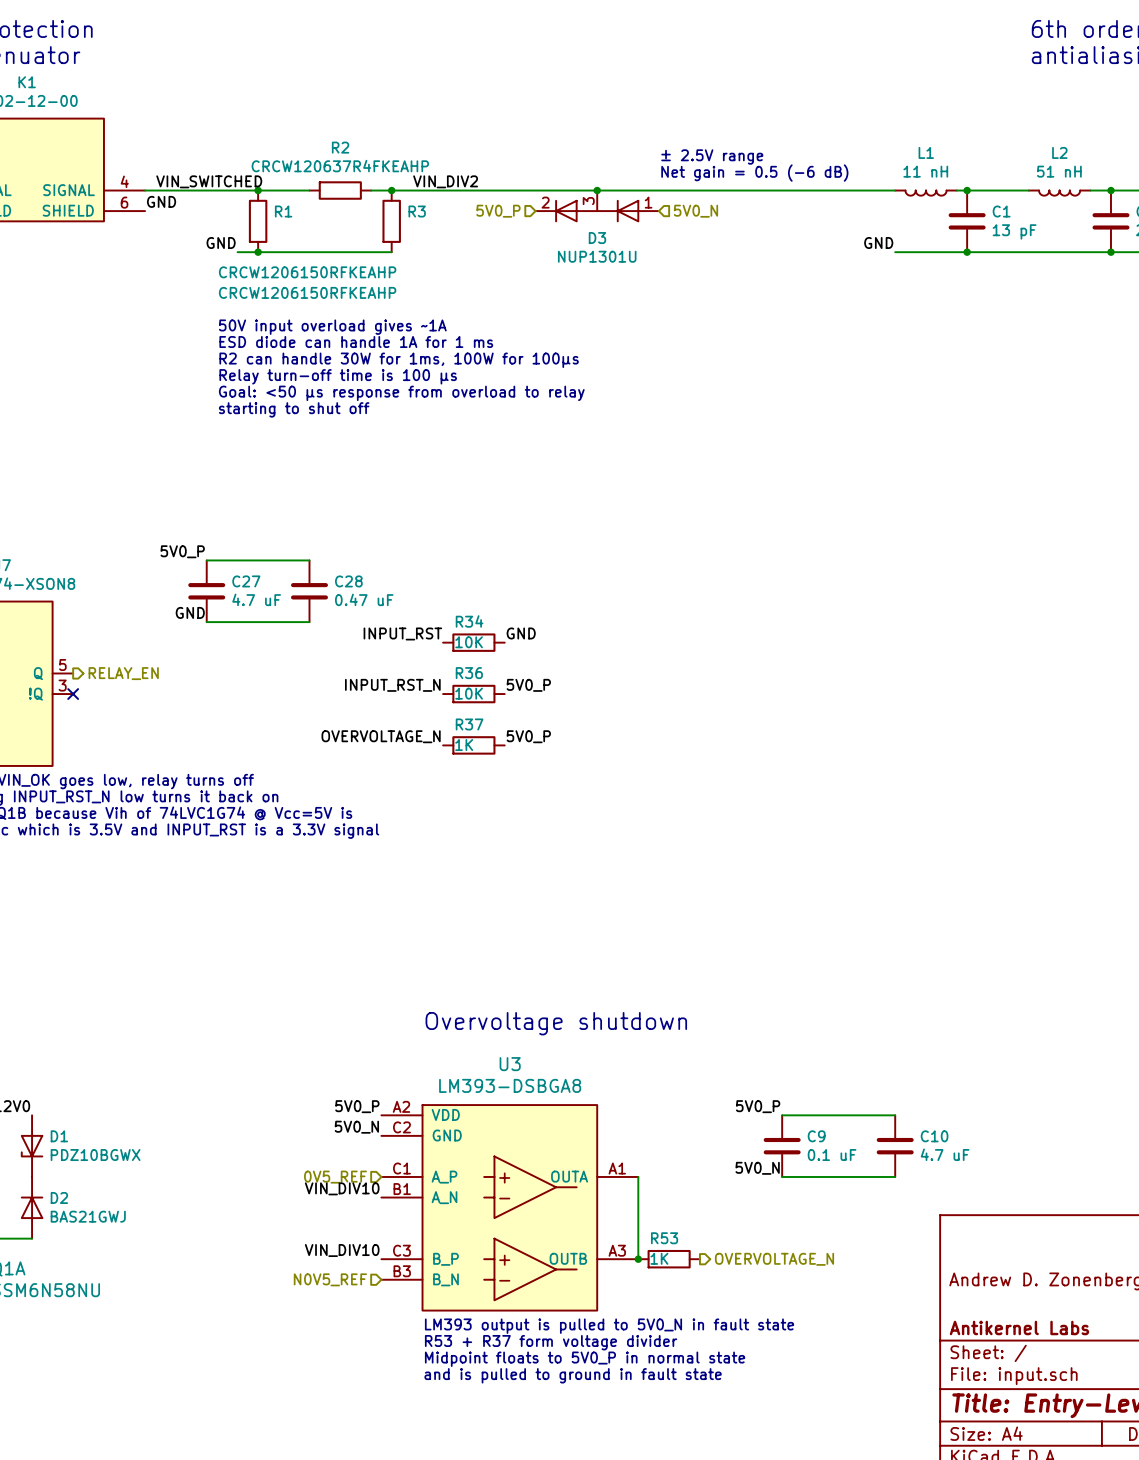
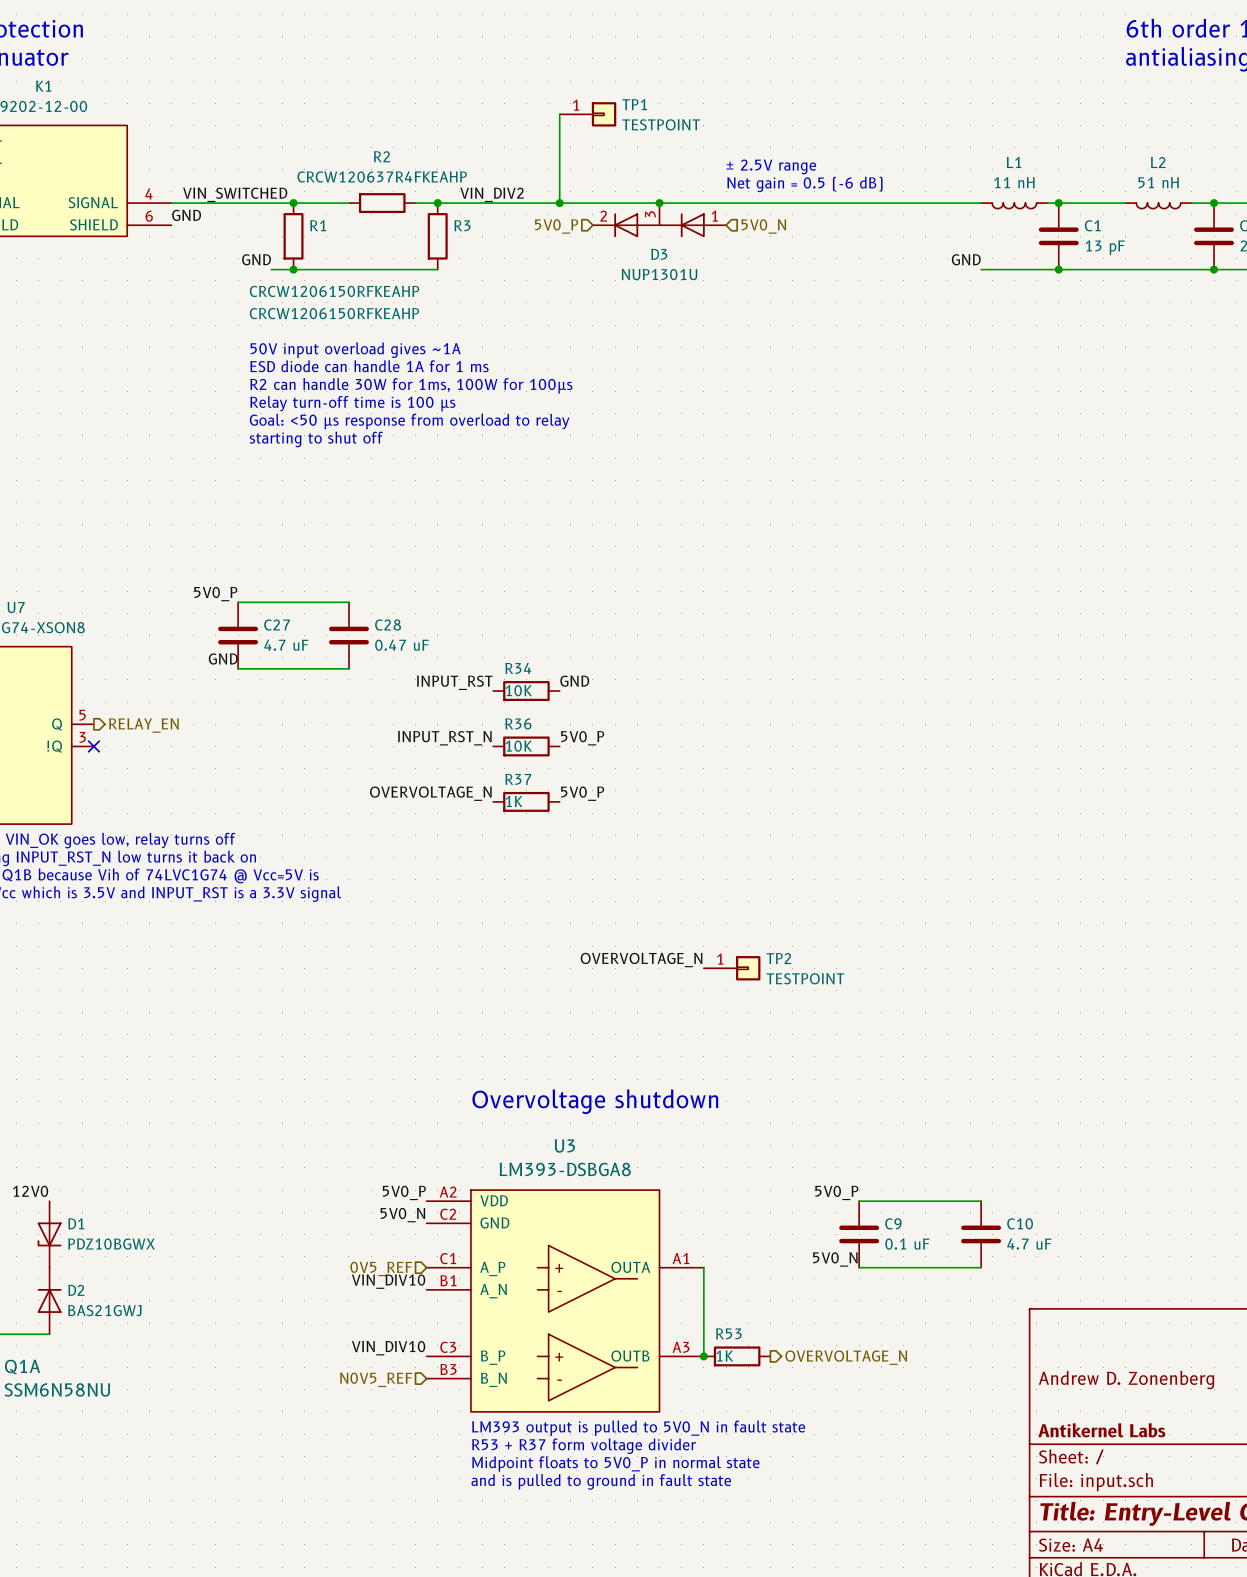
wire: none -> (559, 114) (559, 203)
TP1: none -> TESTPOINT (587, 114)
junction: none -> (559, 203)
label: none -> OVERVOLTAGE_N (641, 960)
TP2: none -> TESTPOINT (732, 968)

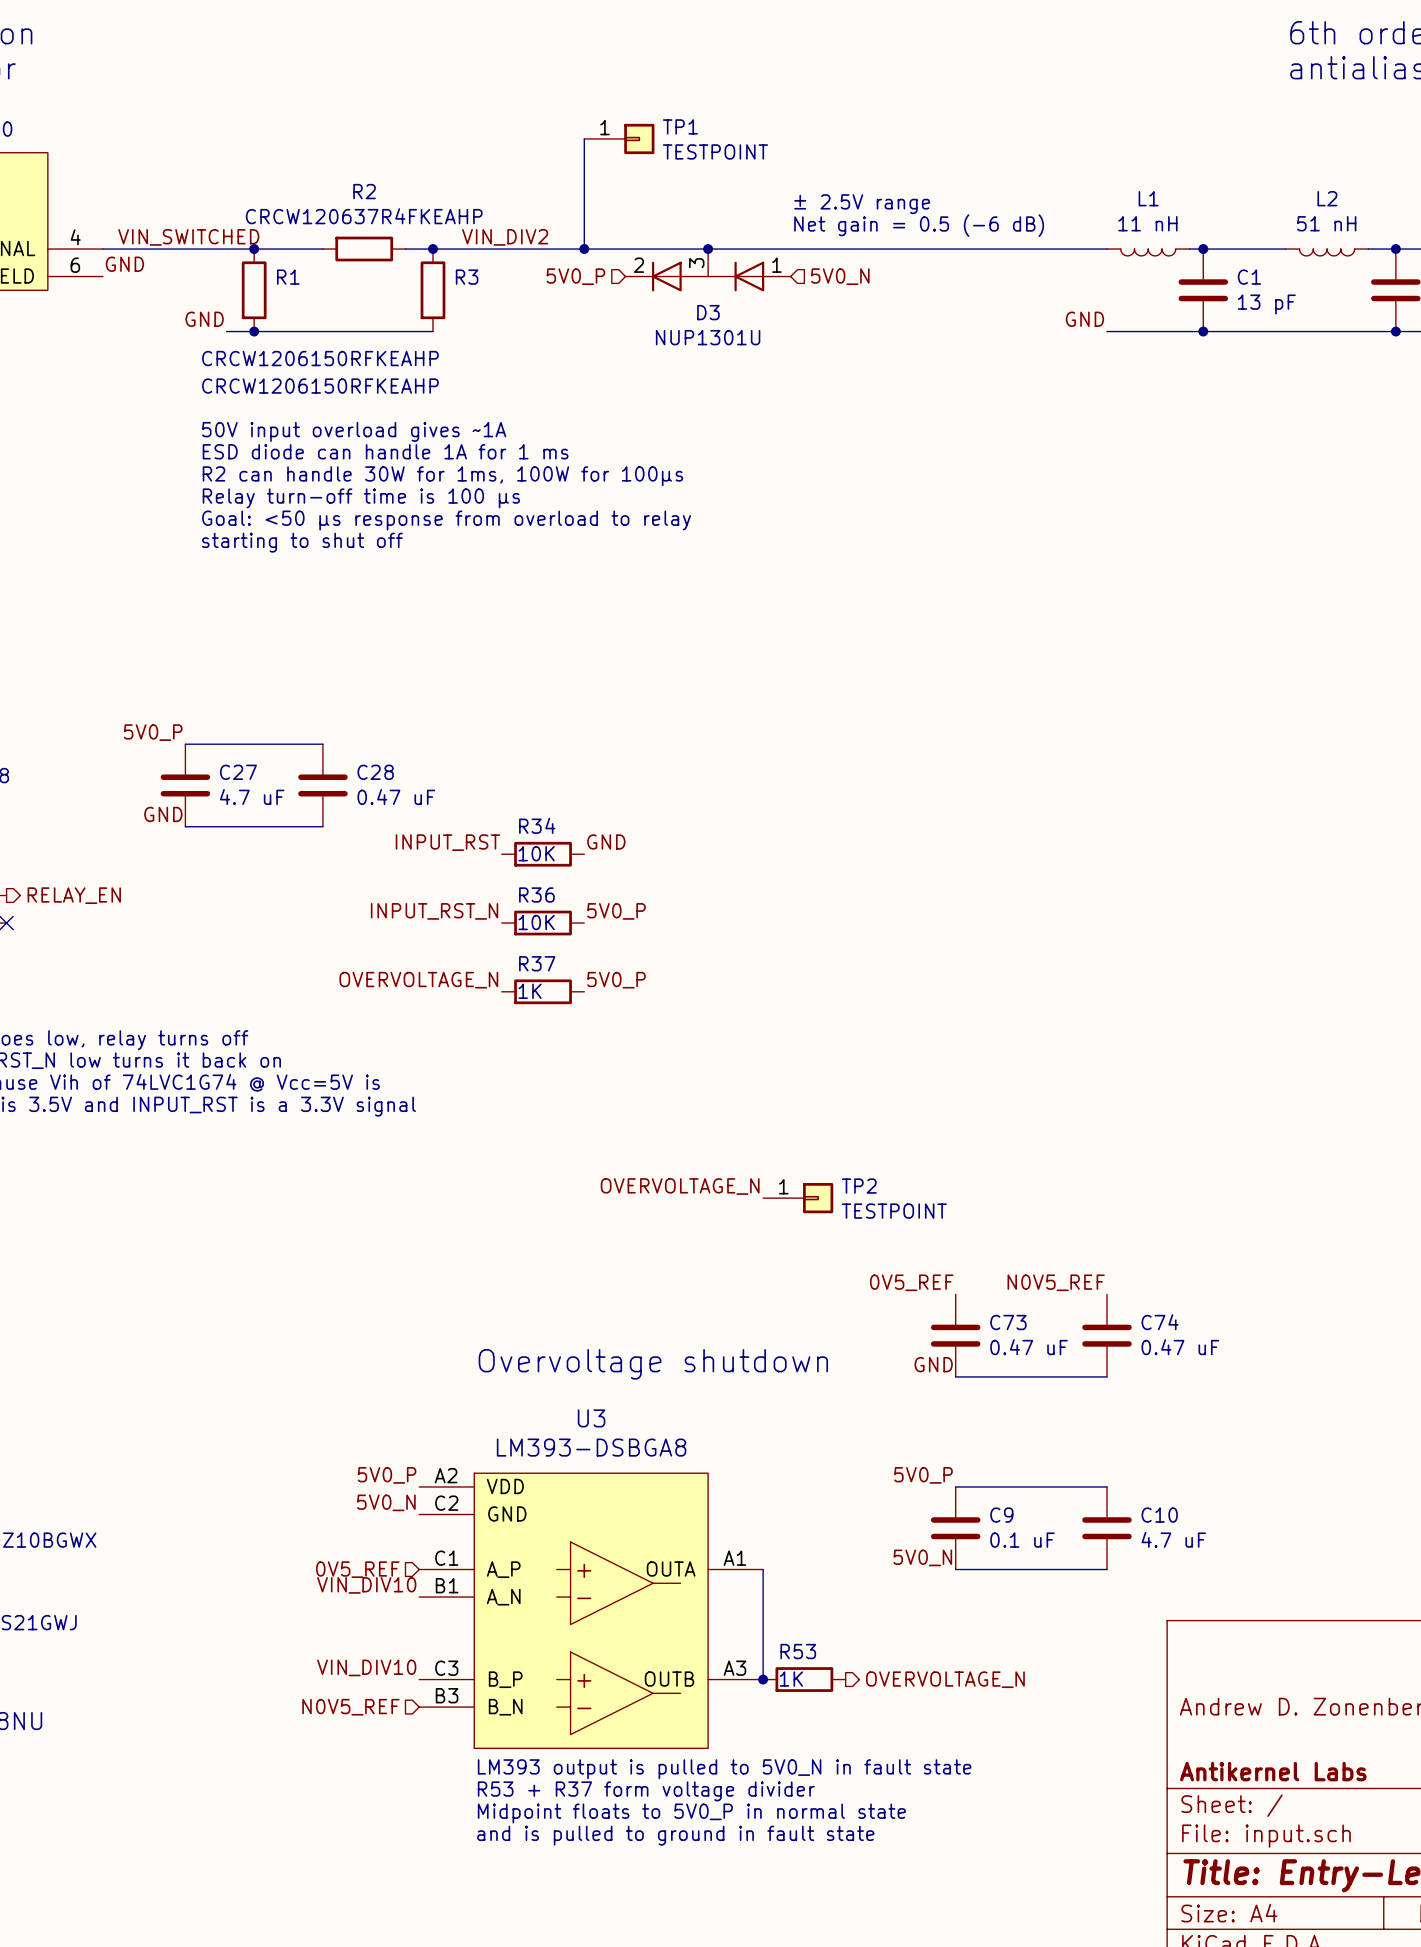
label: none -> 0V5_REF (911, 1282)
label: none -> N0V5_REF (1056, 1282)
C73: none -> 0.47 uF (955, 1335)
C74: none -> 0.47 uF (1107, 1335)
label: none -> GND (933, 1364)
wire: none -> (955, 1376) (1107, 1376)

